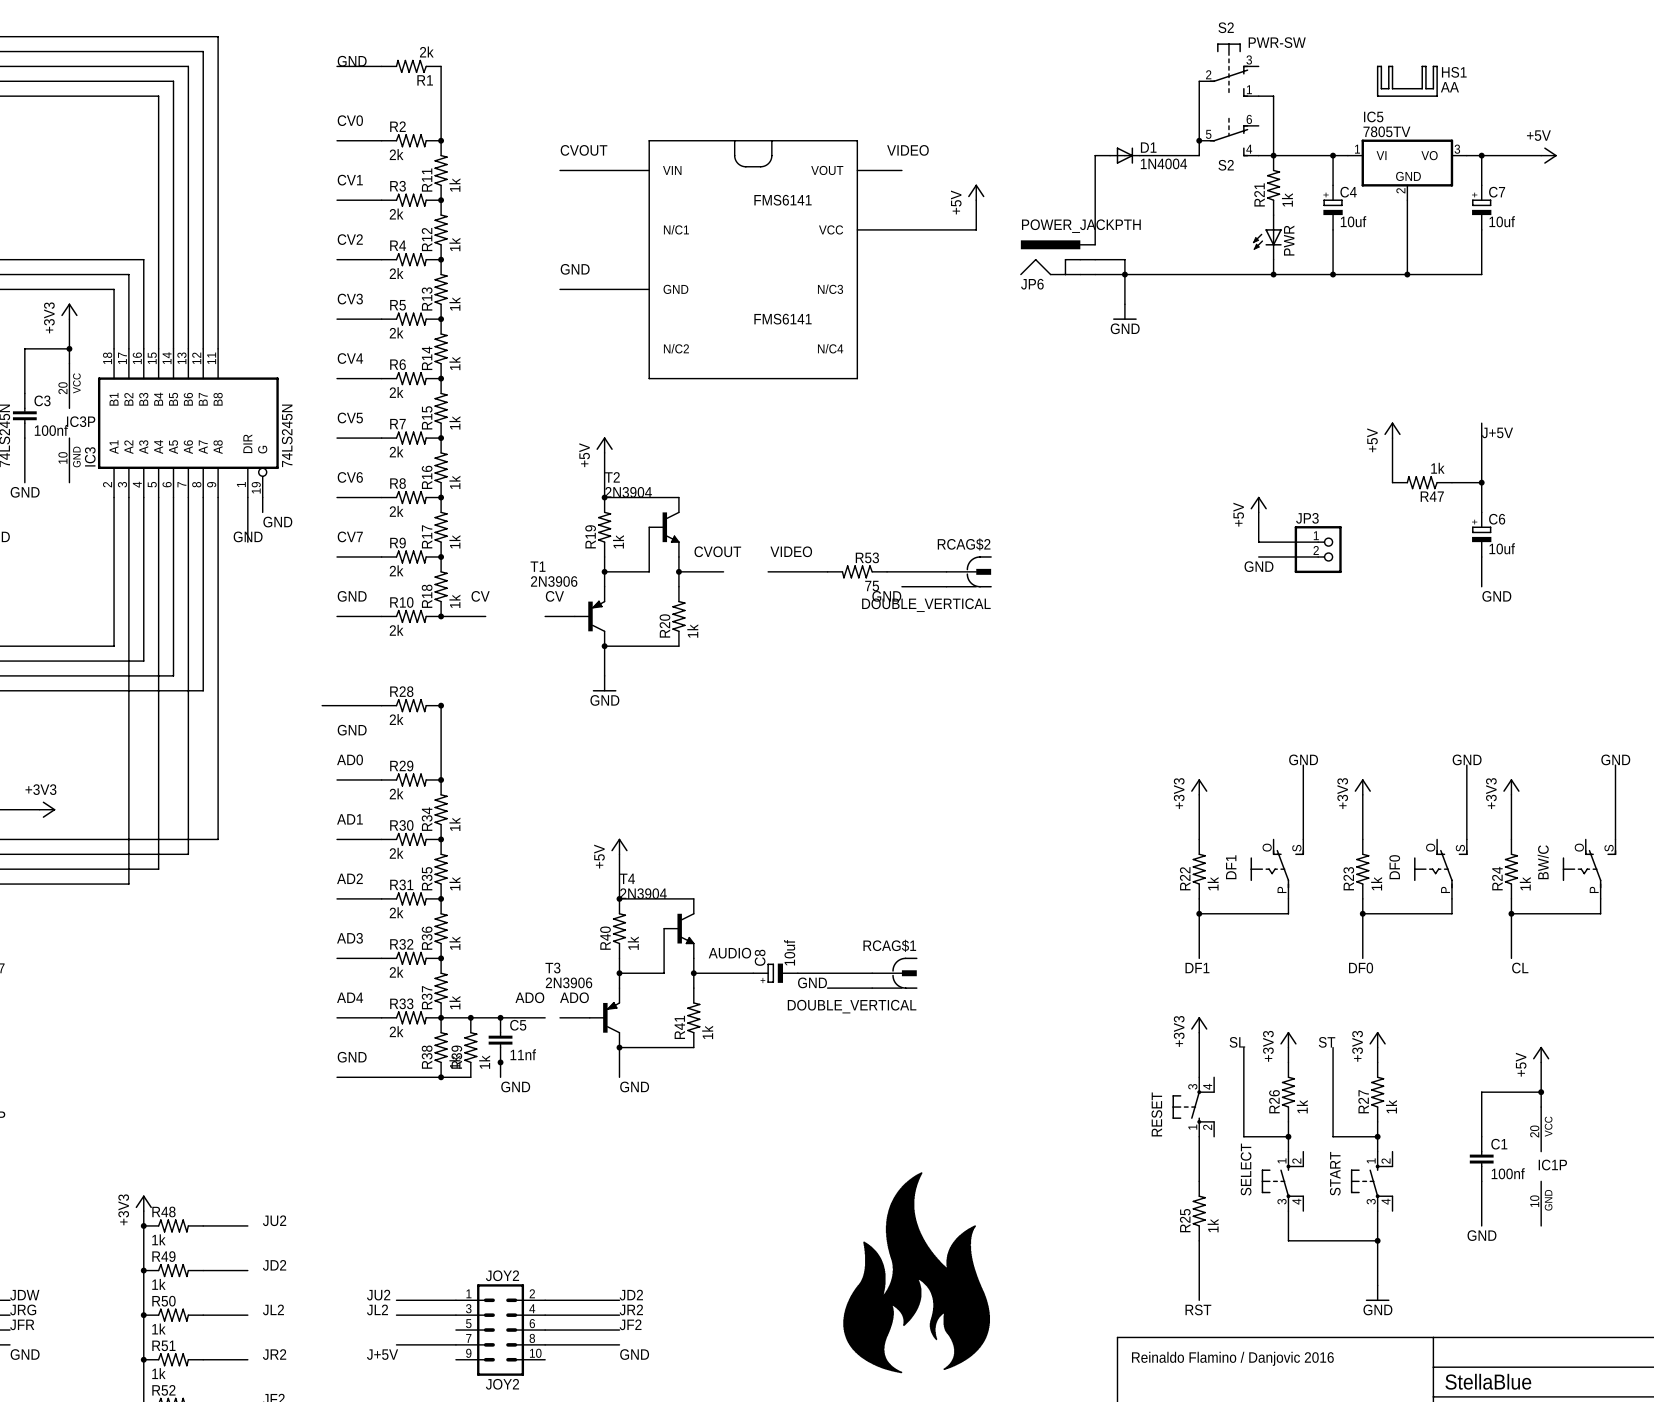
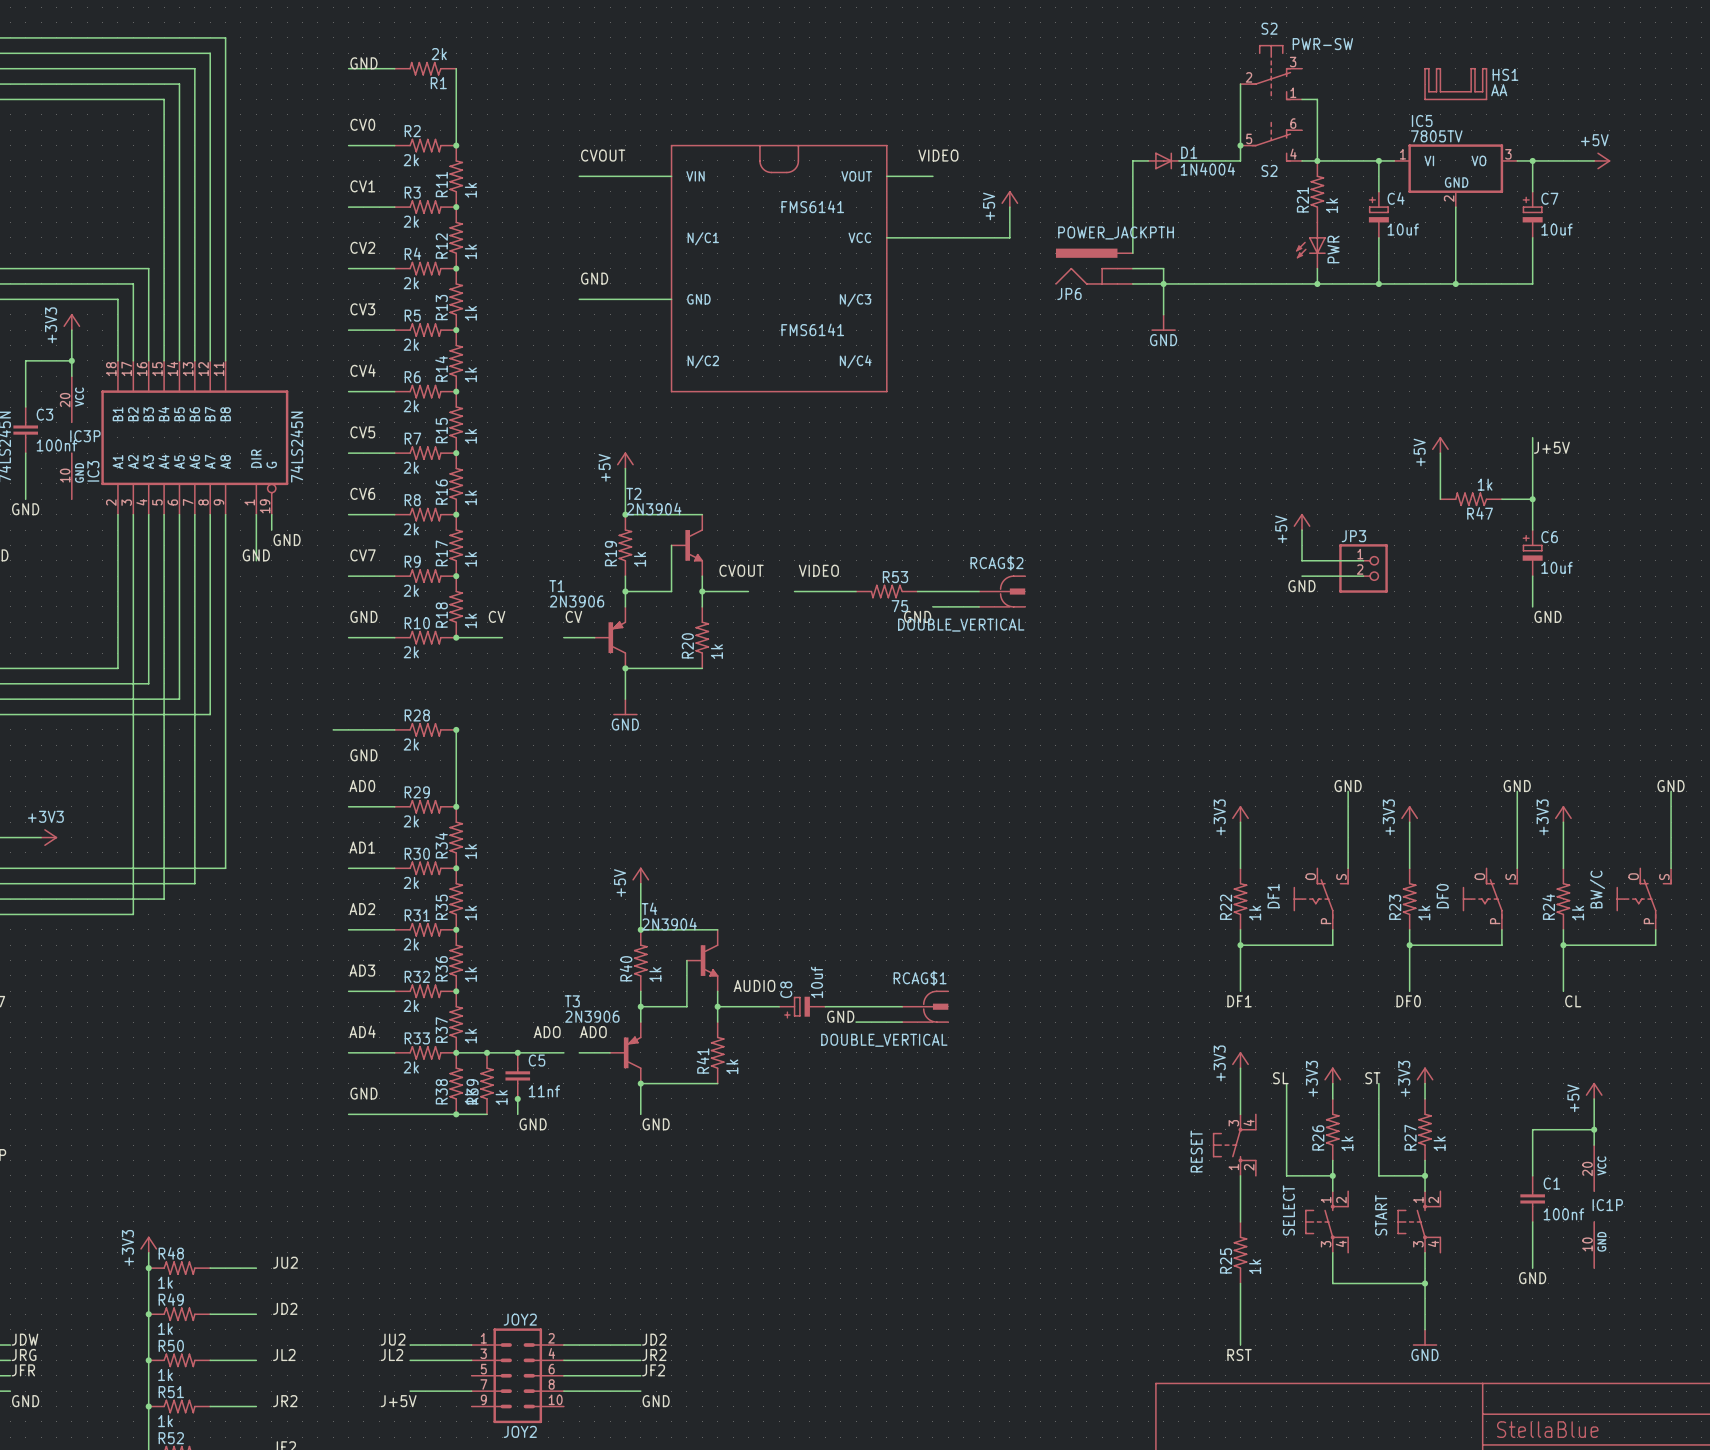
drawing: [843, 1172, 991, 1374] -> none
text: Reinaldo Flamino / Danjovic 2016 (1232, 1358) -> none

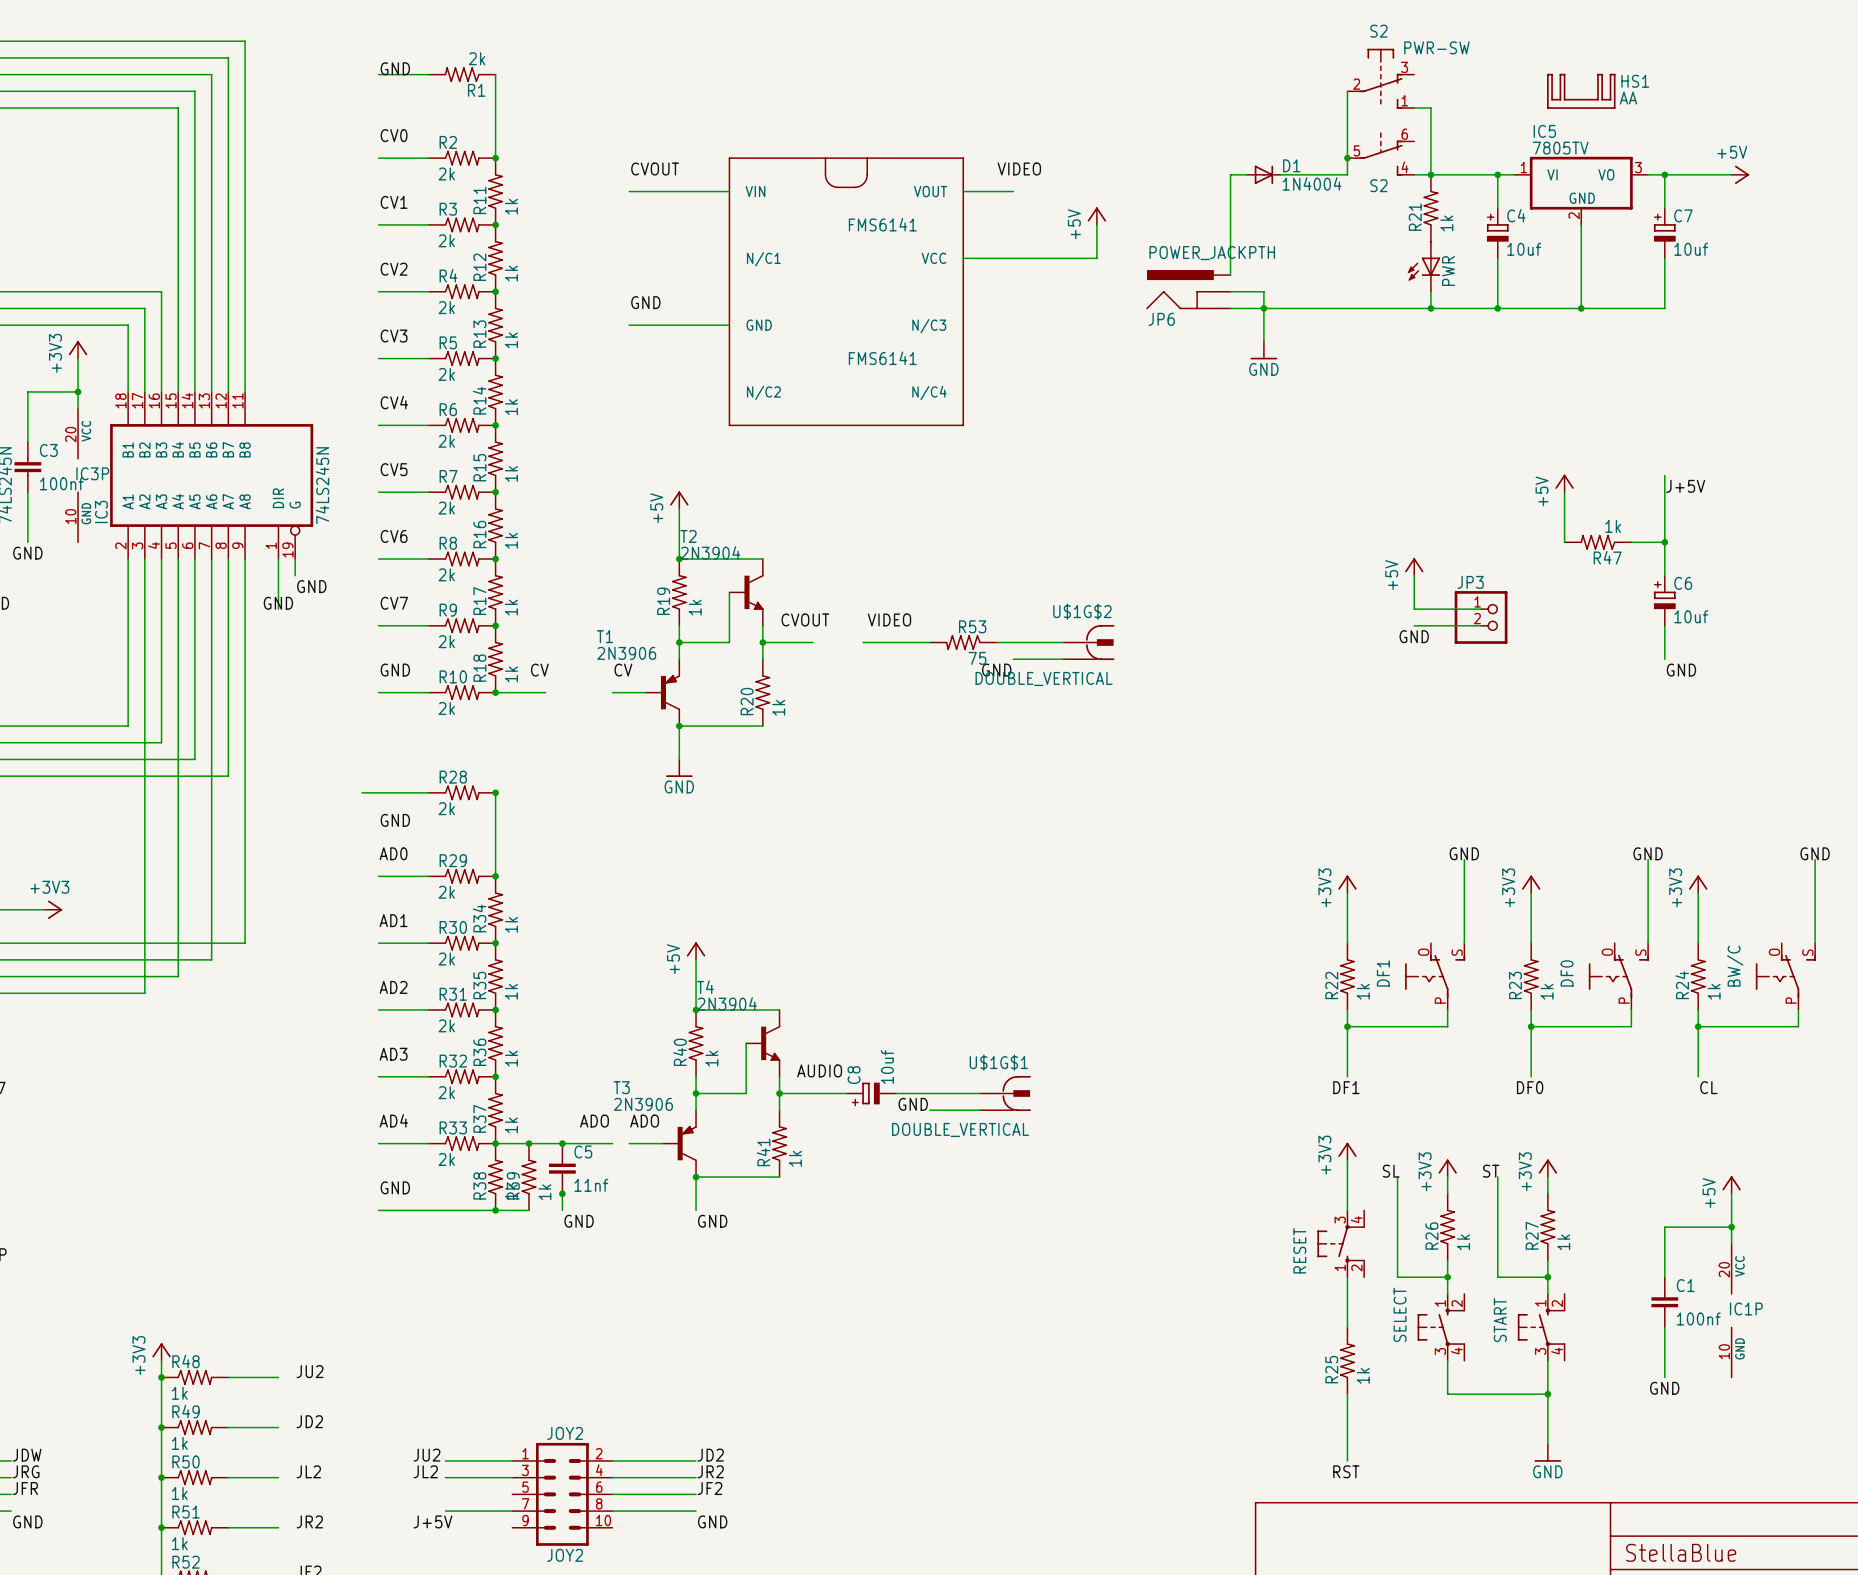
RCAG$2 name: RCAG$2 (996, 563) -> U$1G$2 (1082, 611)
RCAG$1 name: RCAG$1 (920, 978) -> U$1G$1 (998, 1062)

